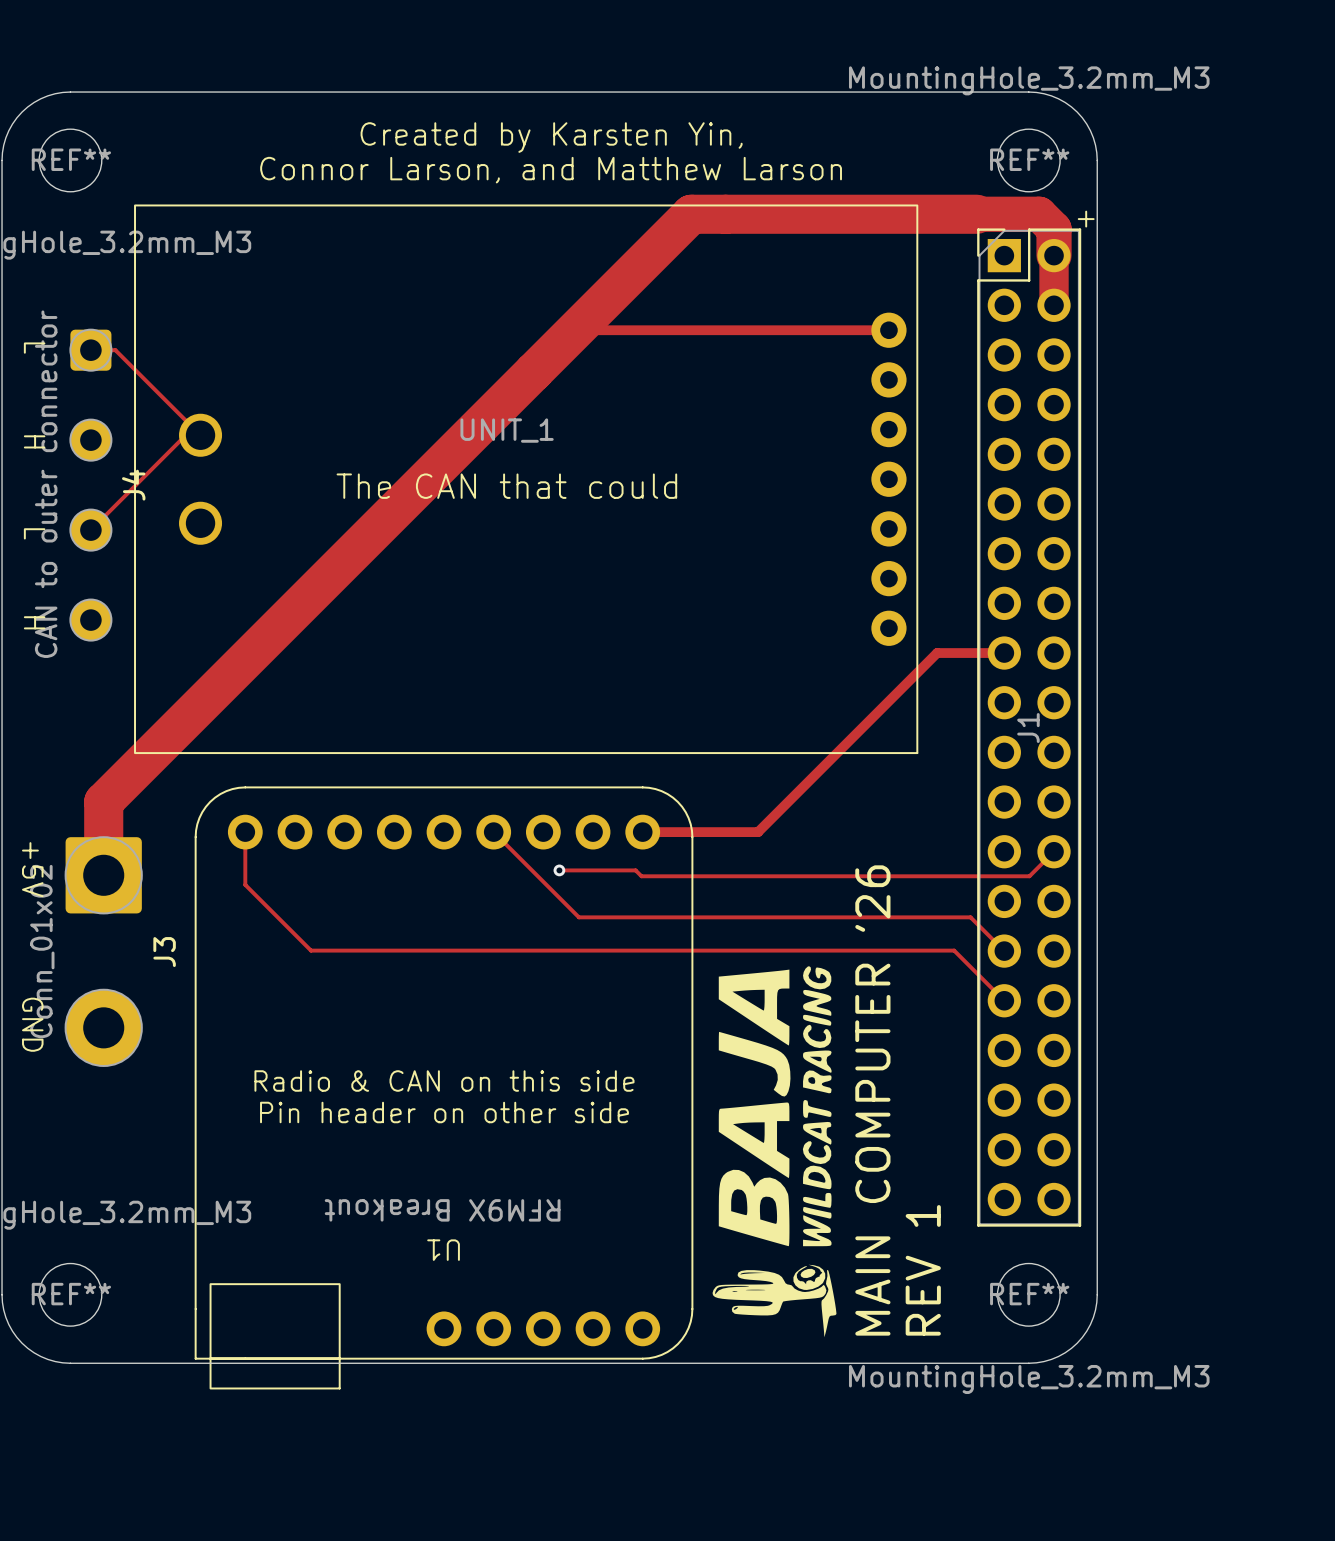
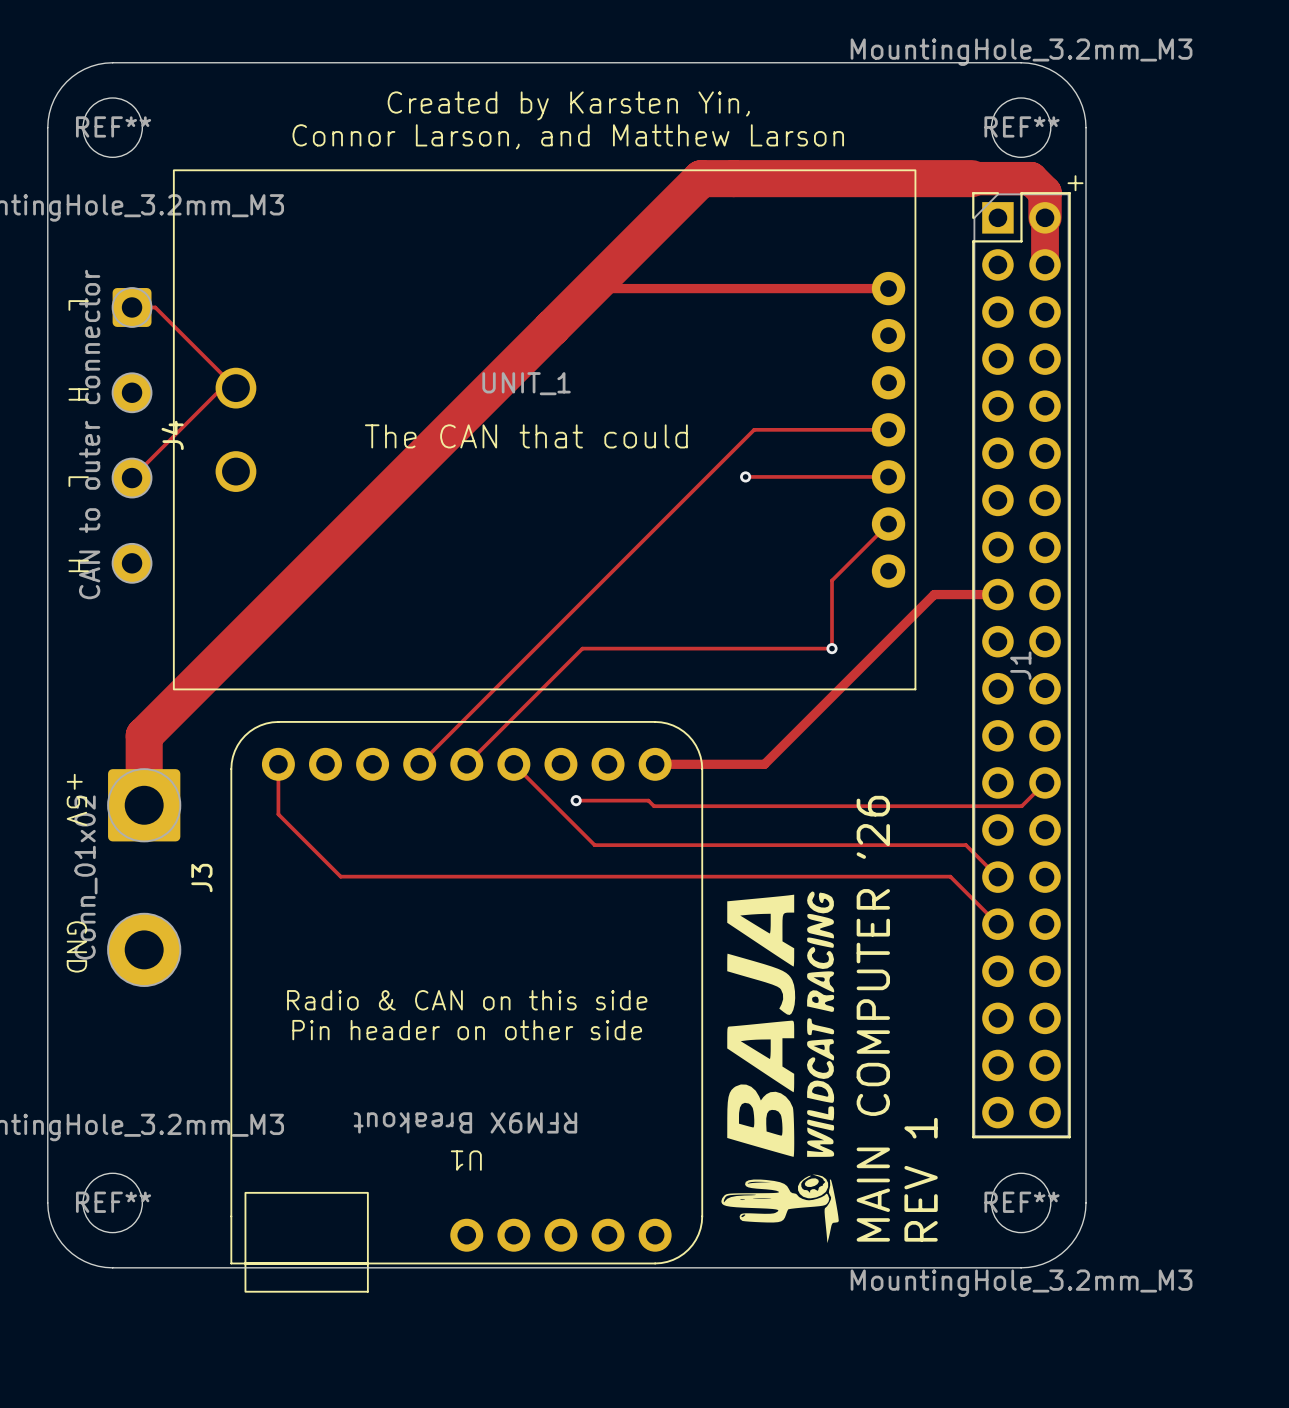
track: none -> (888, 429) (754, 429) (419, 764)
track: none -> (745, 476) (888, 476)
via: none -> (745, 476)
track: none -> (888, 524) (832, 580) (832, 648) (582, 648) (466, 764)
via: none -> (832, 648)

